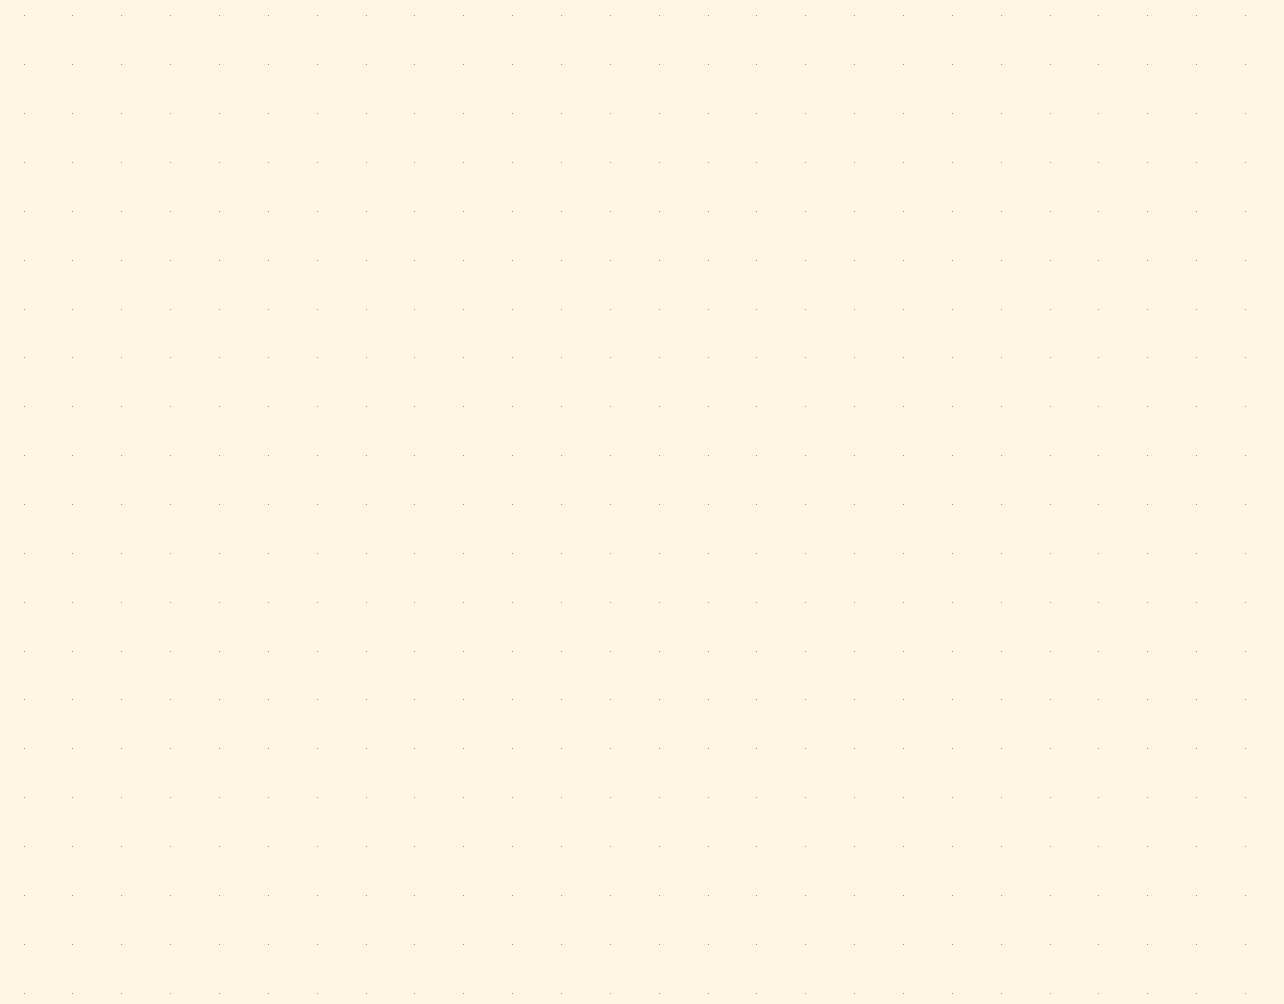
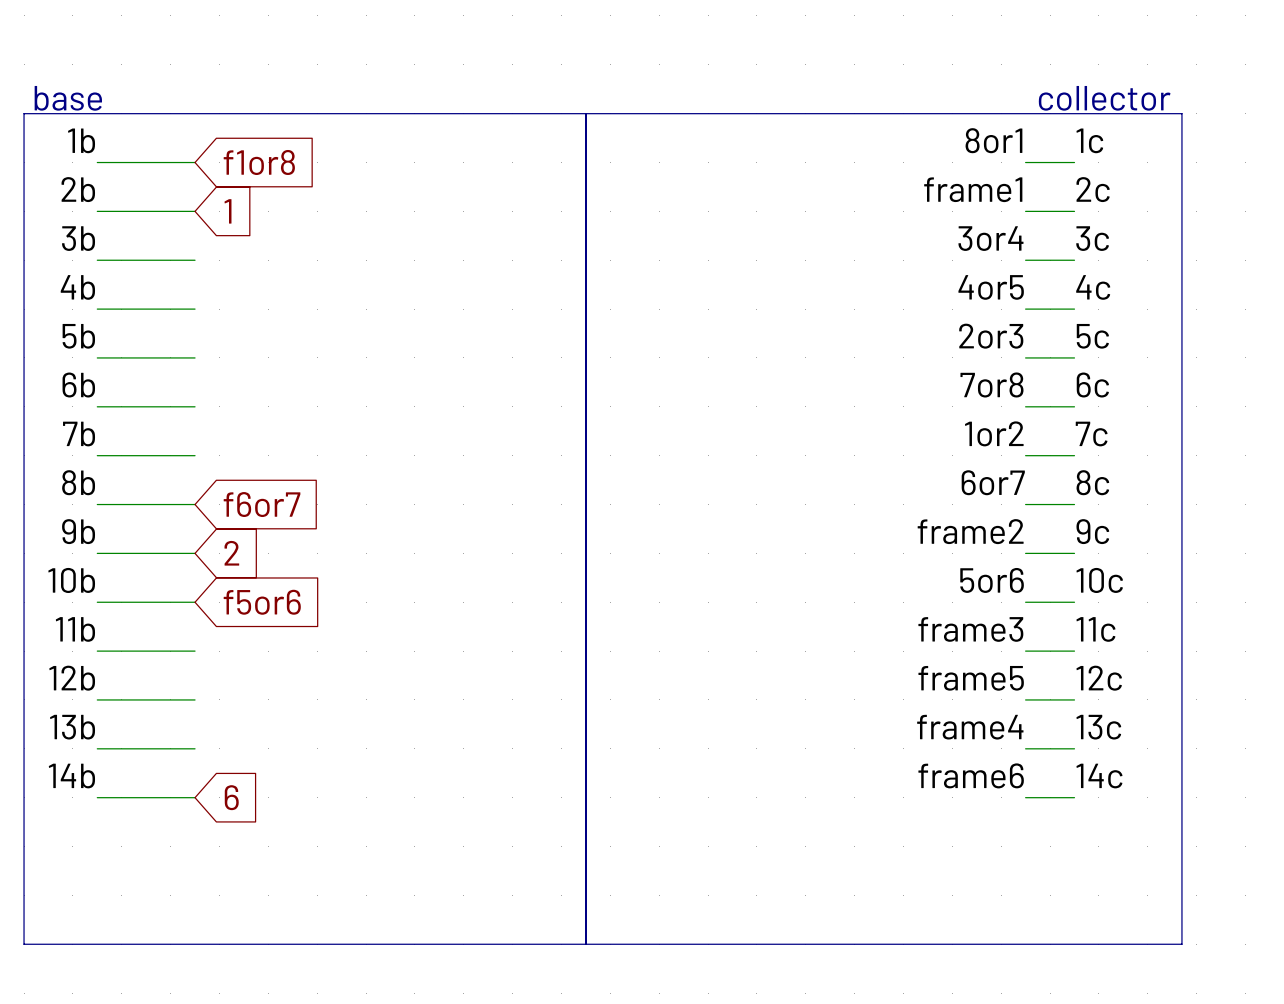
text: none -> base (68, 98)
text: none -> collector (1104, 98)
line: none -> (24, 113) (1181, 113) (1181, 944) (24, 944) (24, 113)
line: none -> (585, 113) (585, 944)
label: none -> 1b (81, 140)
label: none -> 8or1 (993, 140)
label: none -> 1c (1089, 140)
wire: none -> (97, 162) (195, 162)
global label: none -> f1or8 (259, 162)
wire: none -> (1025, 162) (1074, 162)
label: none -> 2b (78, 189)
label: none -> frame1 (973, 189)
label: none -> 2c (1093, 189)
wire: none -> (97, 211) (195, 211)
global label: none -> 1 (228, 211)
wire: none -> (1025, 211) (1074, 211)
label: none -> 3or4 (990, 238)
label: none -> 3b (78, 238)
label: none -> 3c (1092, 238)
wire: none -> (97, 260) (195, 260)
wire: none -> (1025, 260) (1074, 260)
label: none -> 4b (77, 287)
label: none -> 4or5 (991, 287)
label: none -> 4c (1093, 287)
wire: none -> (97, 309) (195, 309)
wire: none -> (1025, 309) (1074, 309)
label: none -> 5b (78, 336)
label: none -> 2or3 (991, 336)
label: none -> 5c (1092, 336)
wire: none -> (97, 357) (195, 357)
wire: none -> (1025, 357) (1074, 357)
label: none -> 6b (78, 385)
label: none -> 7or8 (991, 384)
label: none -> 6c (1092, 385)
wire: none -> (97, 406) (195, 406)
wire: none -> (1025, 406) (1074, 406)
label: none -> 7b (79, 434)
label: none -> 1or2 (994, 433)
label: none -> 7c (1091, 434)
wire: none -> (97, 455) (195, 455)
wire: none -> (1025, 455) (1074, 455)
label: none -> 8b (78, 482)
label: none -> 6or7 (993, 482)
label: none -> 8c (1092, 482)
wire: none -> (97, 504) (195, 504)
global label: none -> f6or7 (262, 504)
wire: none -> (1025, 504) (1074, 504)
label: none -> 9b (78, 531)
label: none -> frame2 (970, 531)
label: none -> 9c (1092, 531)
wire: none -> (97, 553) (195, 553)
global label: none -> 2 (231, 553)
wire: none -> (1025, 553) (1074, 553)
label: none -> 10b (71, 580)
label: none -> 5or6 (992, 580)
label: none -> 10c (1099, 580)
wire: none -> (97, 602) (195, 602)
global label: none -> f5or6 (262, 602)
wire: none -> (1025, 602) (1074, 602)
label: none -> 11b (75, 629)
label: none -> frame3 (970, 629)
label: none -> 11c (1095, 629)
wire: none -> (97, 651) (195, 651)
wire: none -> (1025, 651) (1074, 651)
label: none -> 12b (72, 678)
label: none -> frame5 (971, 678)
label: none -> 12c (1099, 678)
wire: none -> (97, 699) (195, 699)
wire: none -> (1025, 699) (1074, 699)
label: none -> frame4 (970, 727)
label: none -> 13b (72, 727)
label: none -> 13c (1098, 727)
wire: none -> (97, 748) (195, 748)
wire: none -> (1025, 748) (1074, 748)
label: none -> 14b (71, 776)
label: none -> frame6 (971, 775)
label: none -> 14c (1099, 776)
wire: none -> (97, 797) (195, 797)
global label: none -> 6 (231, 797)
wire: none -> (1025, 797) (1074, 797)

